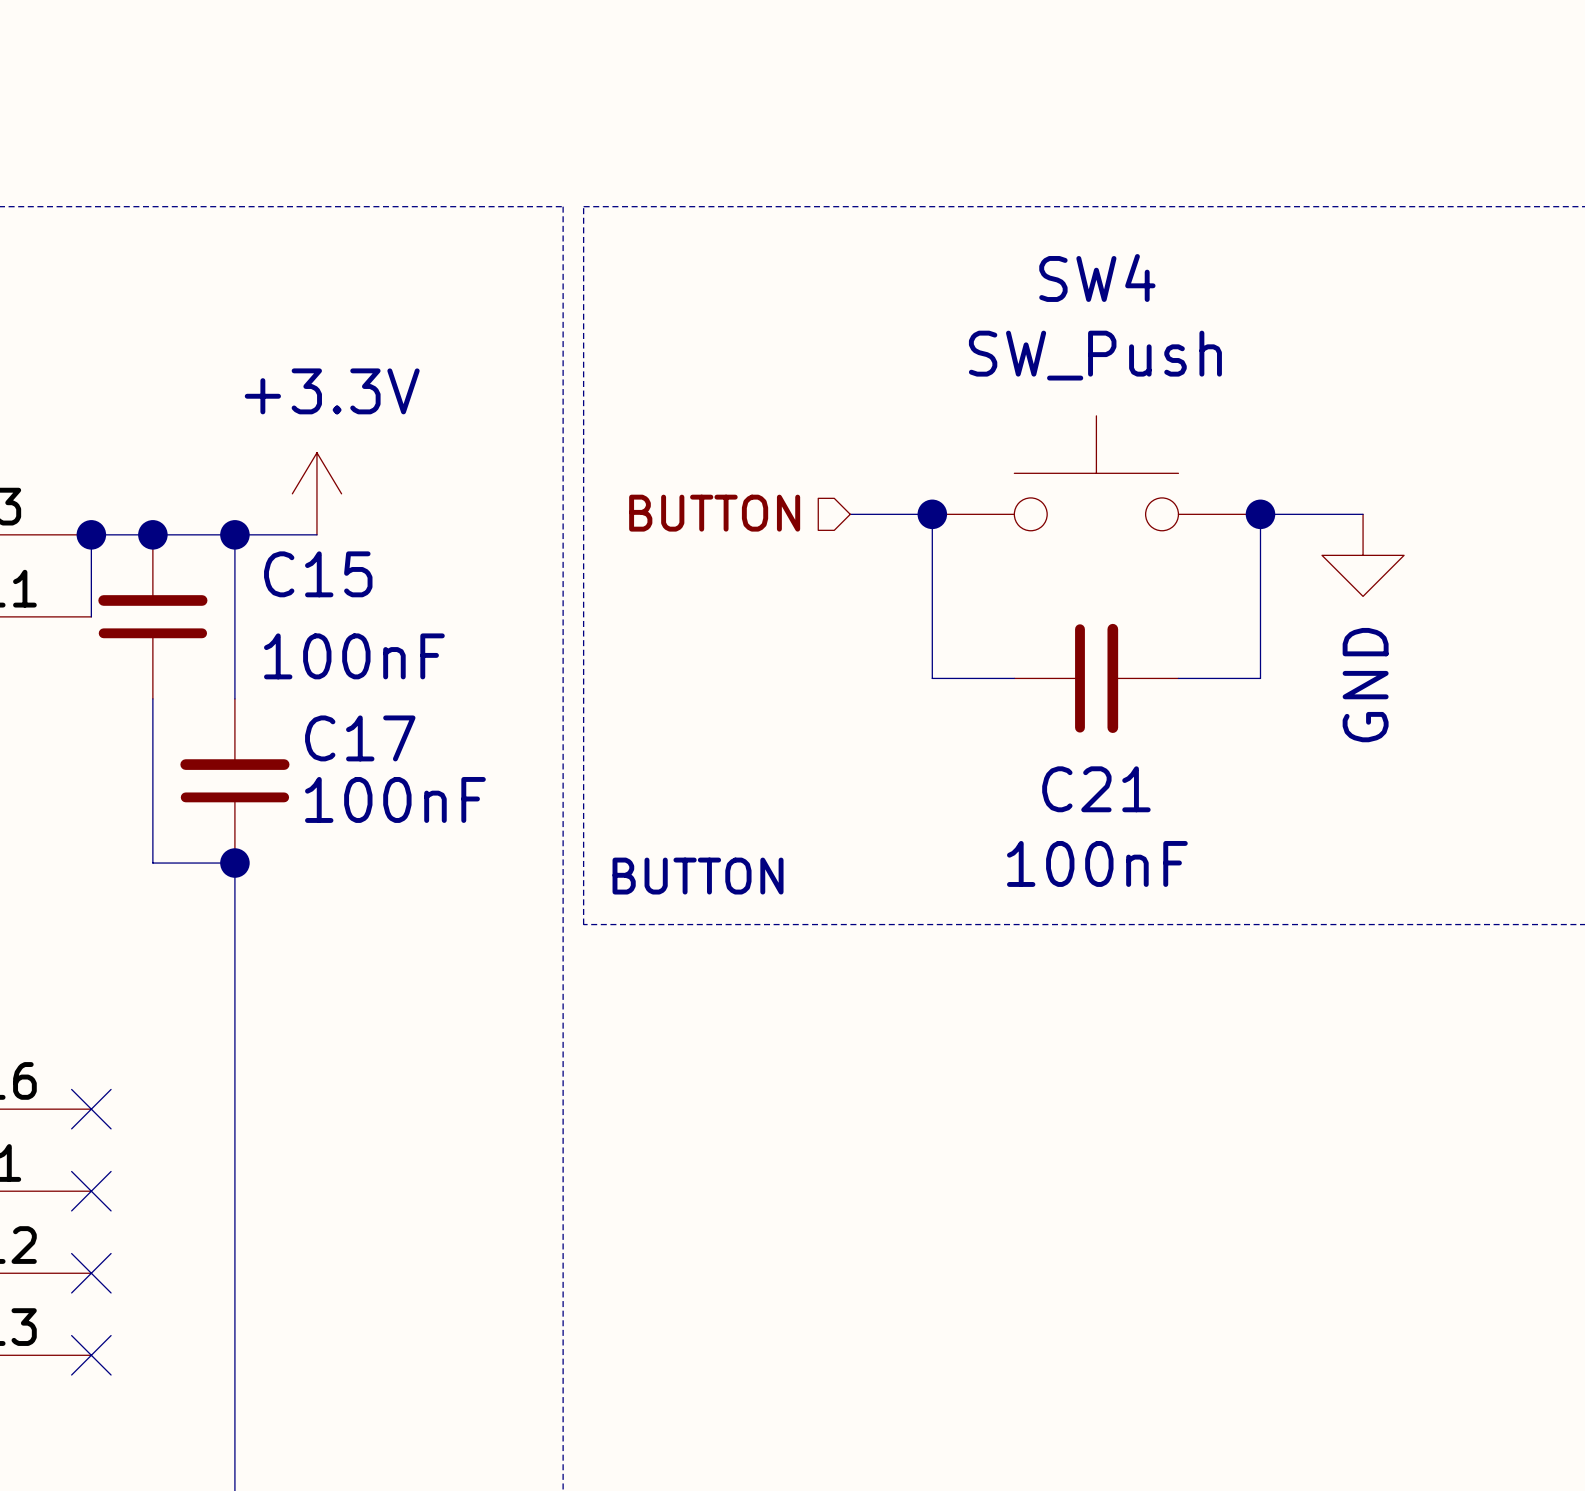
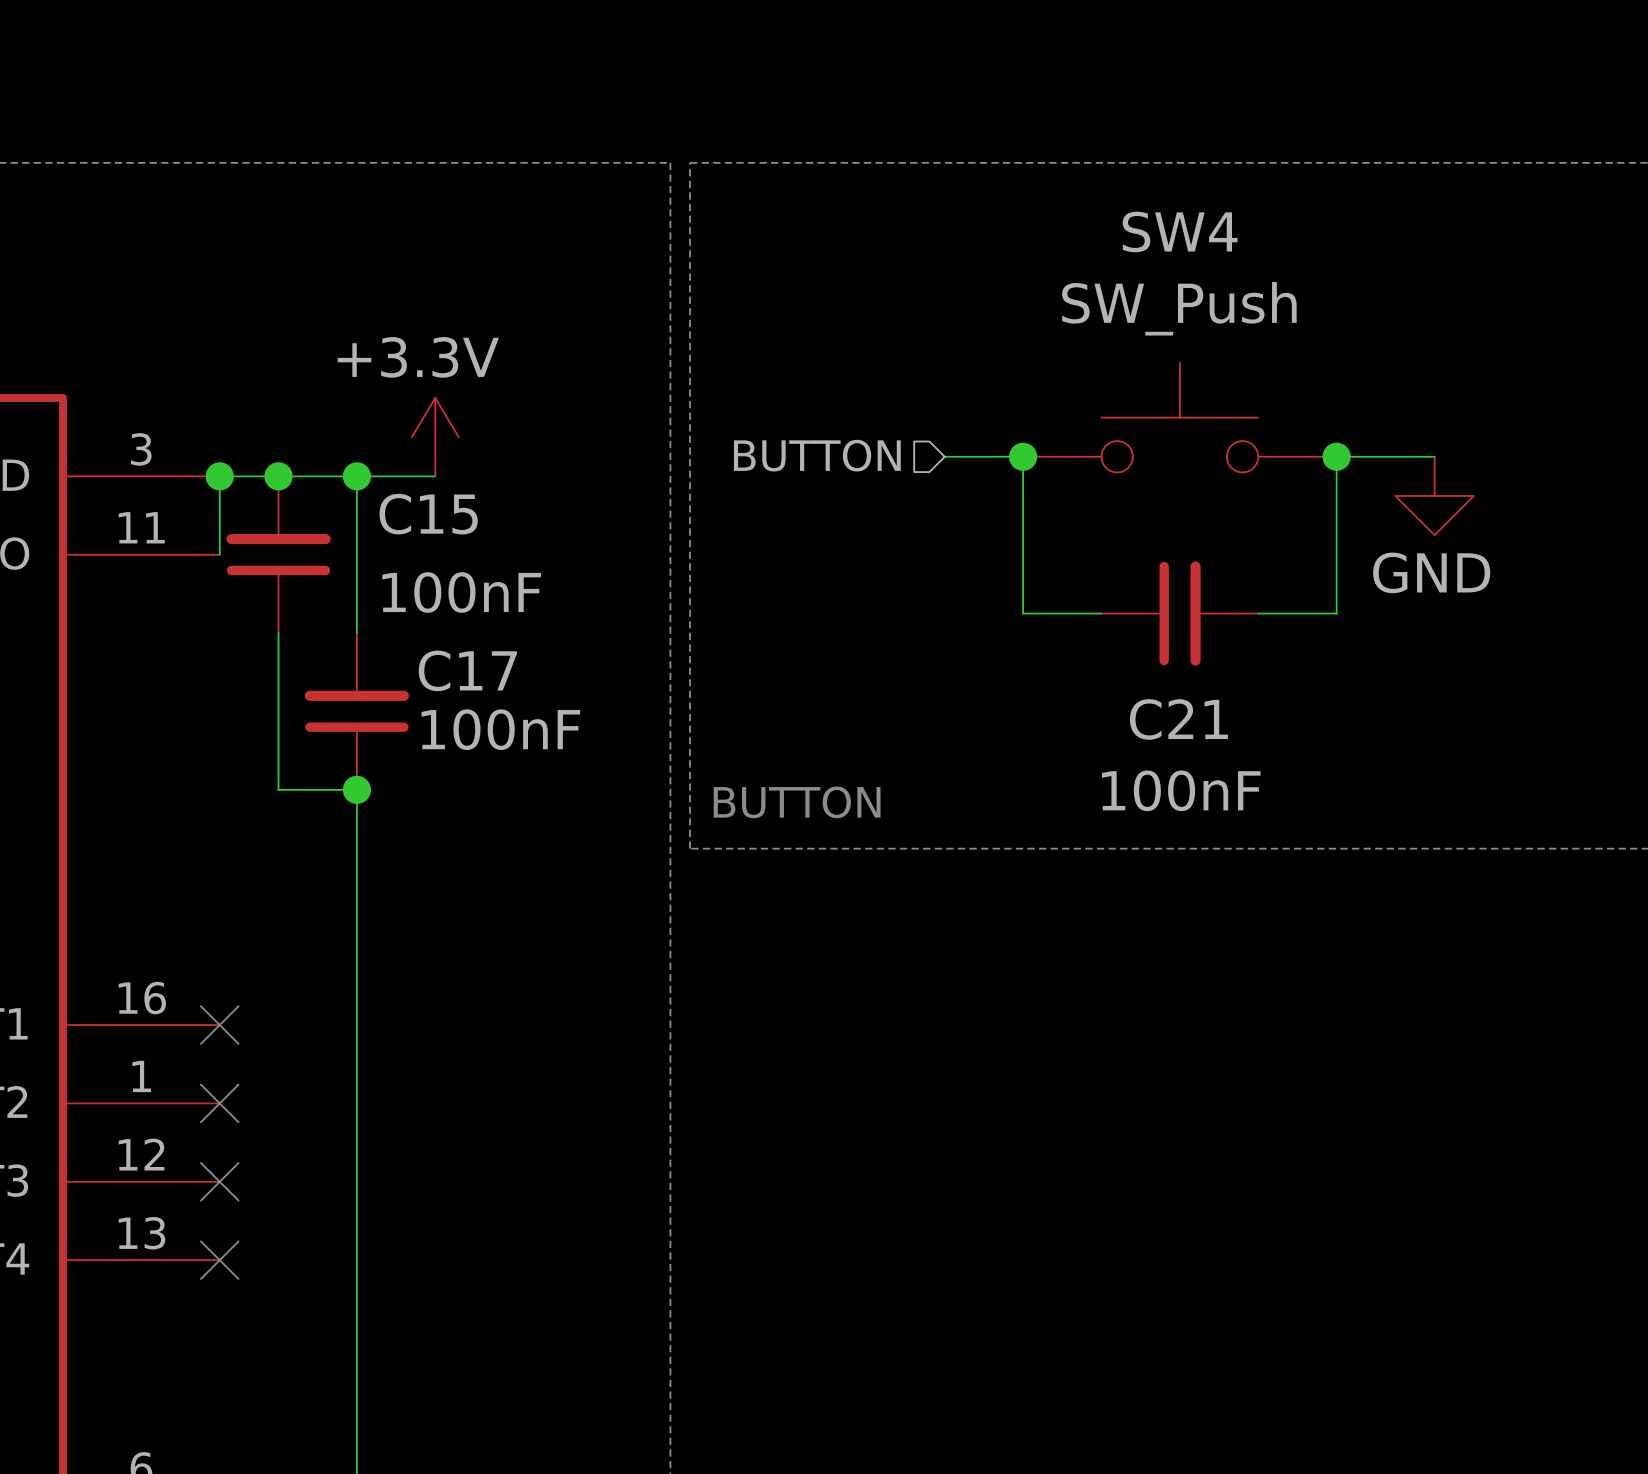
power symbol text position: +3.3V (332, 391) -> +3.3V (418, 357)
power symbol text rotation: 0° (1365, 685) -> 90° clockwise (1431, 572)

